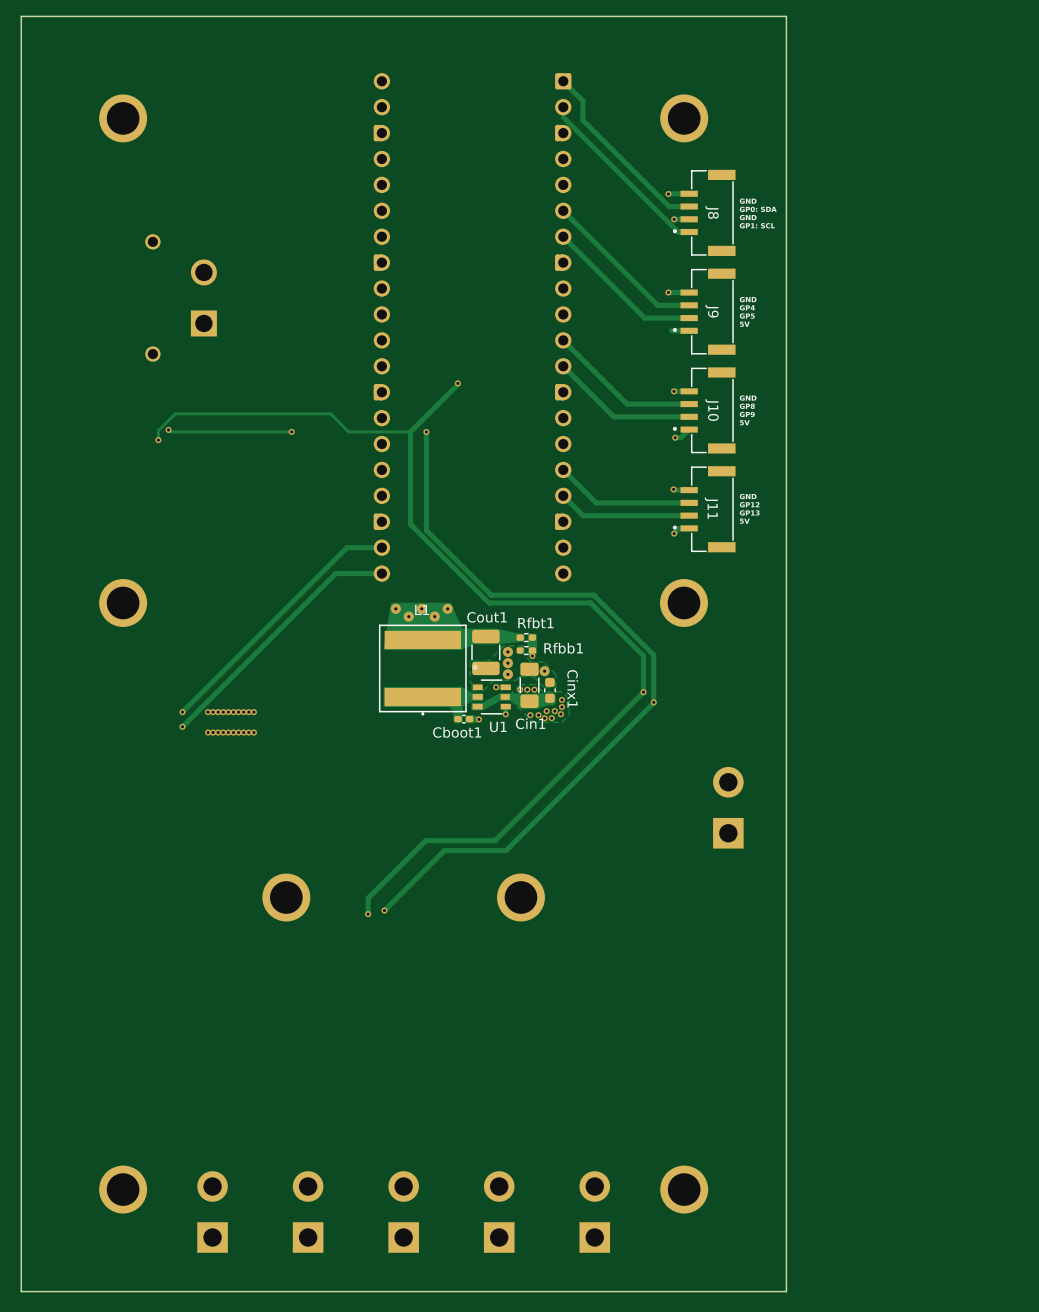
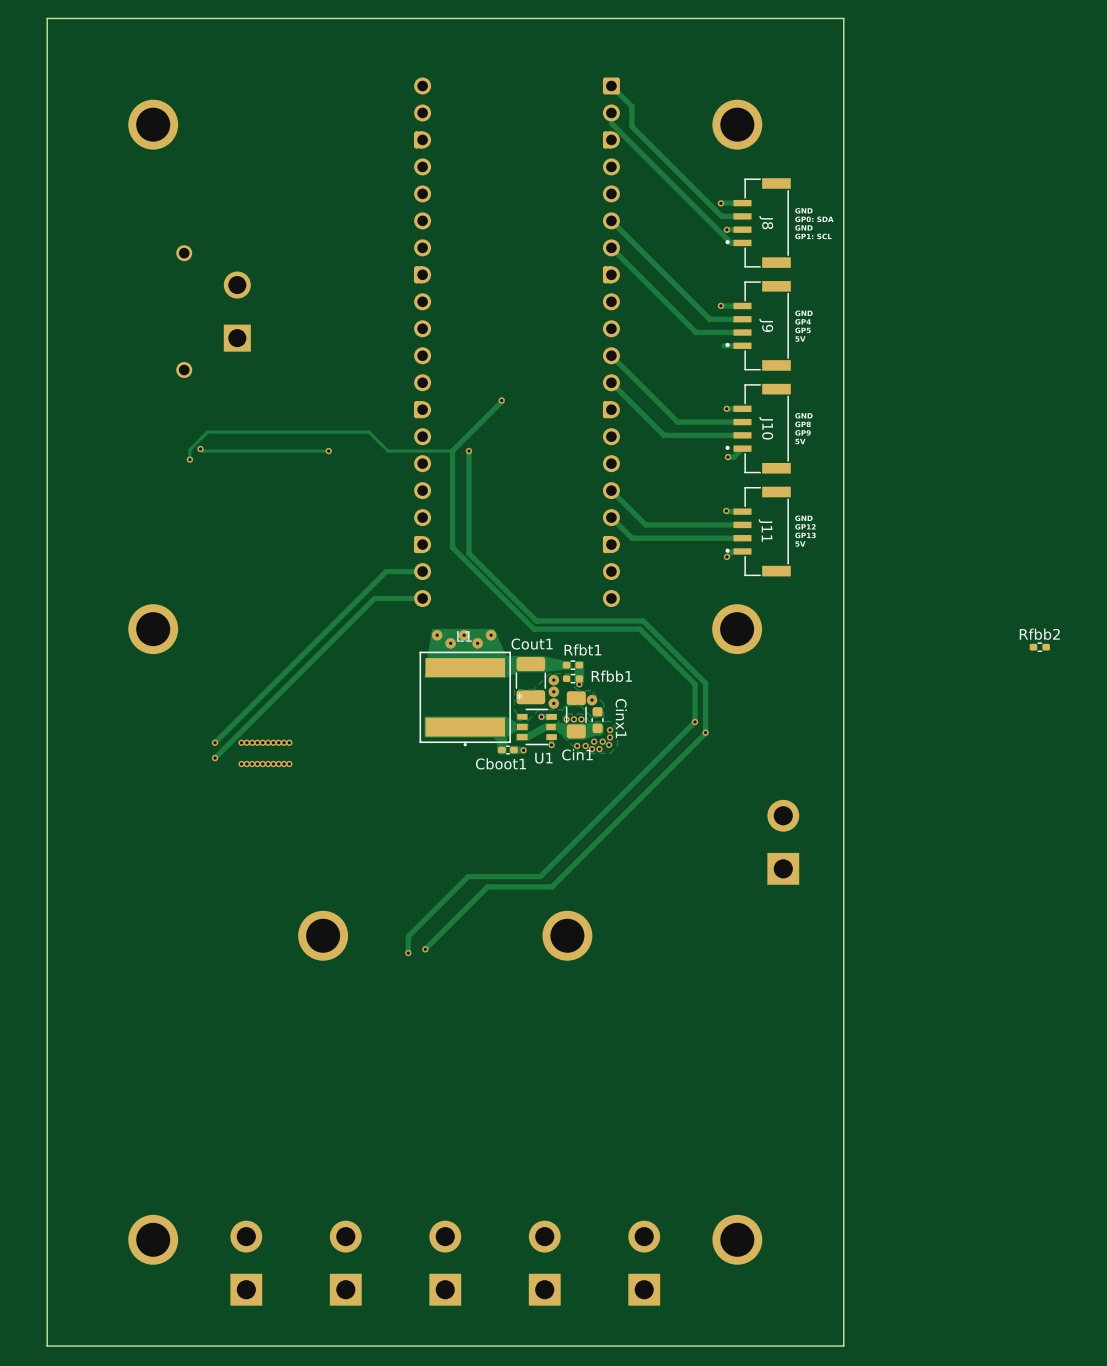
Rfbb2: none -> (1039, 647)

